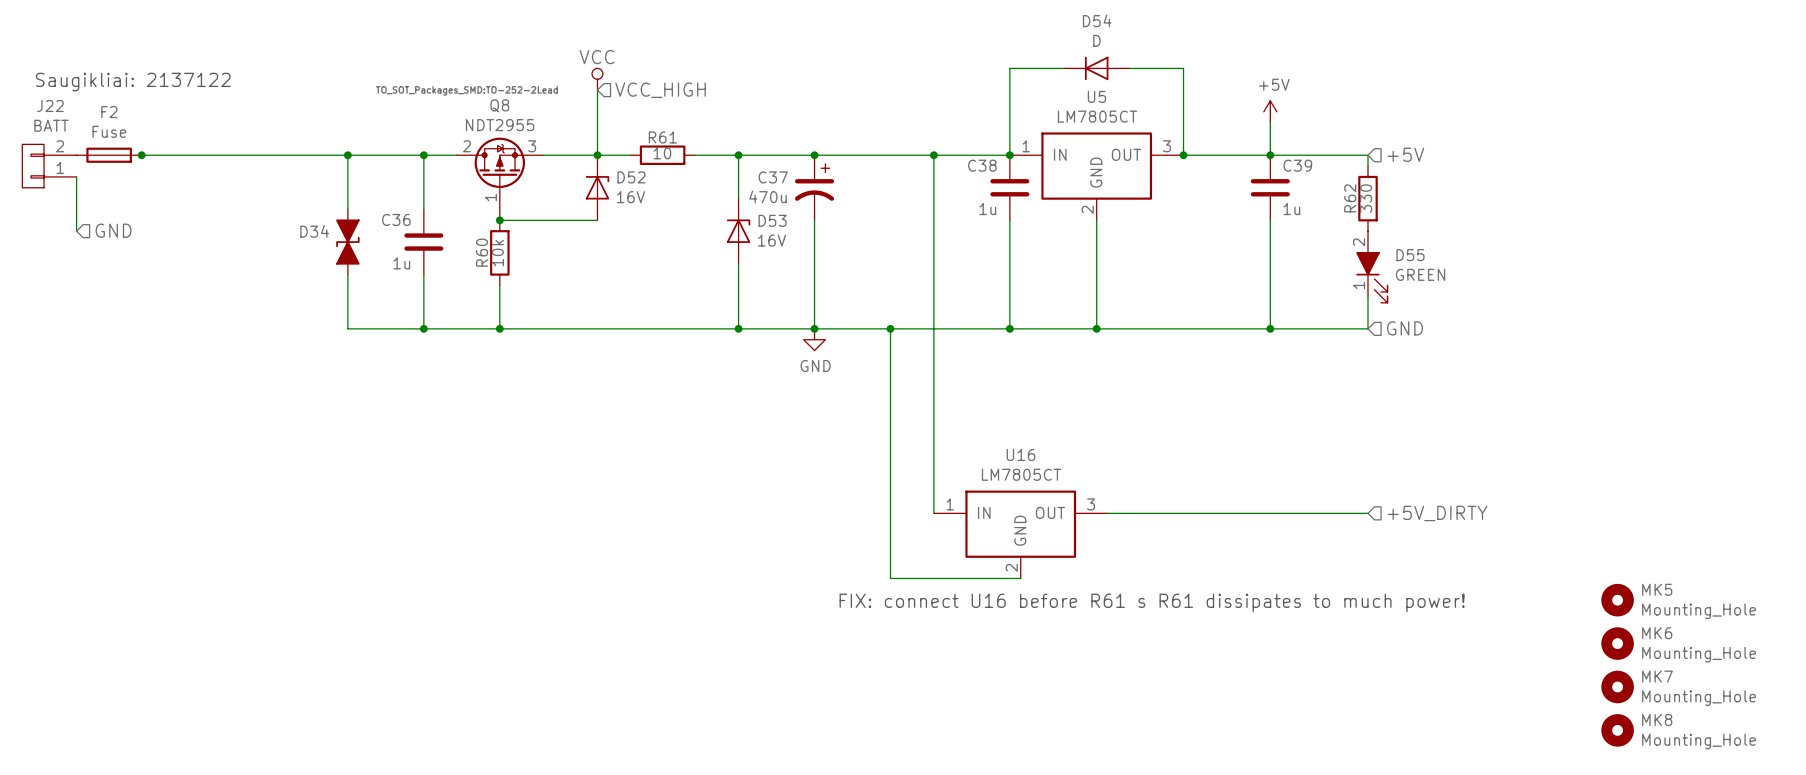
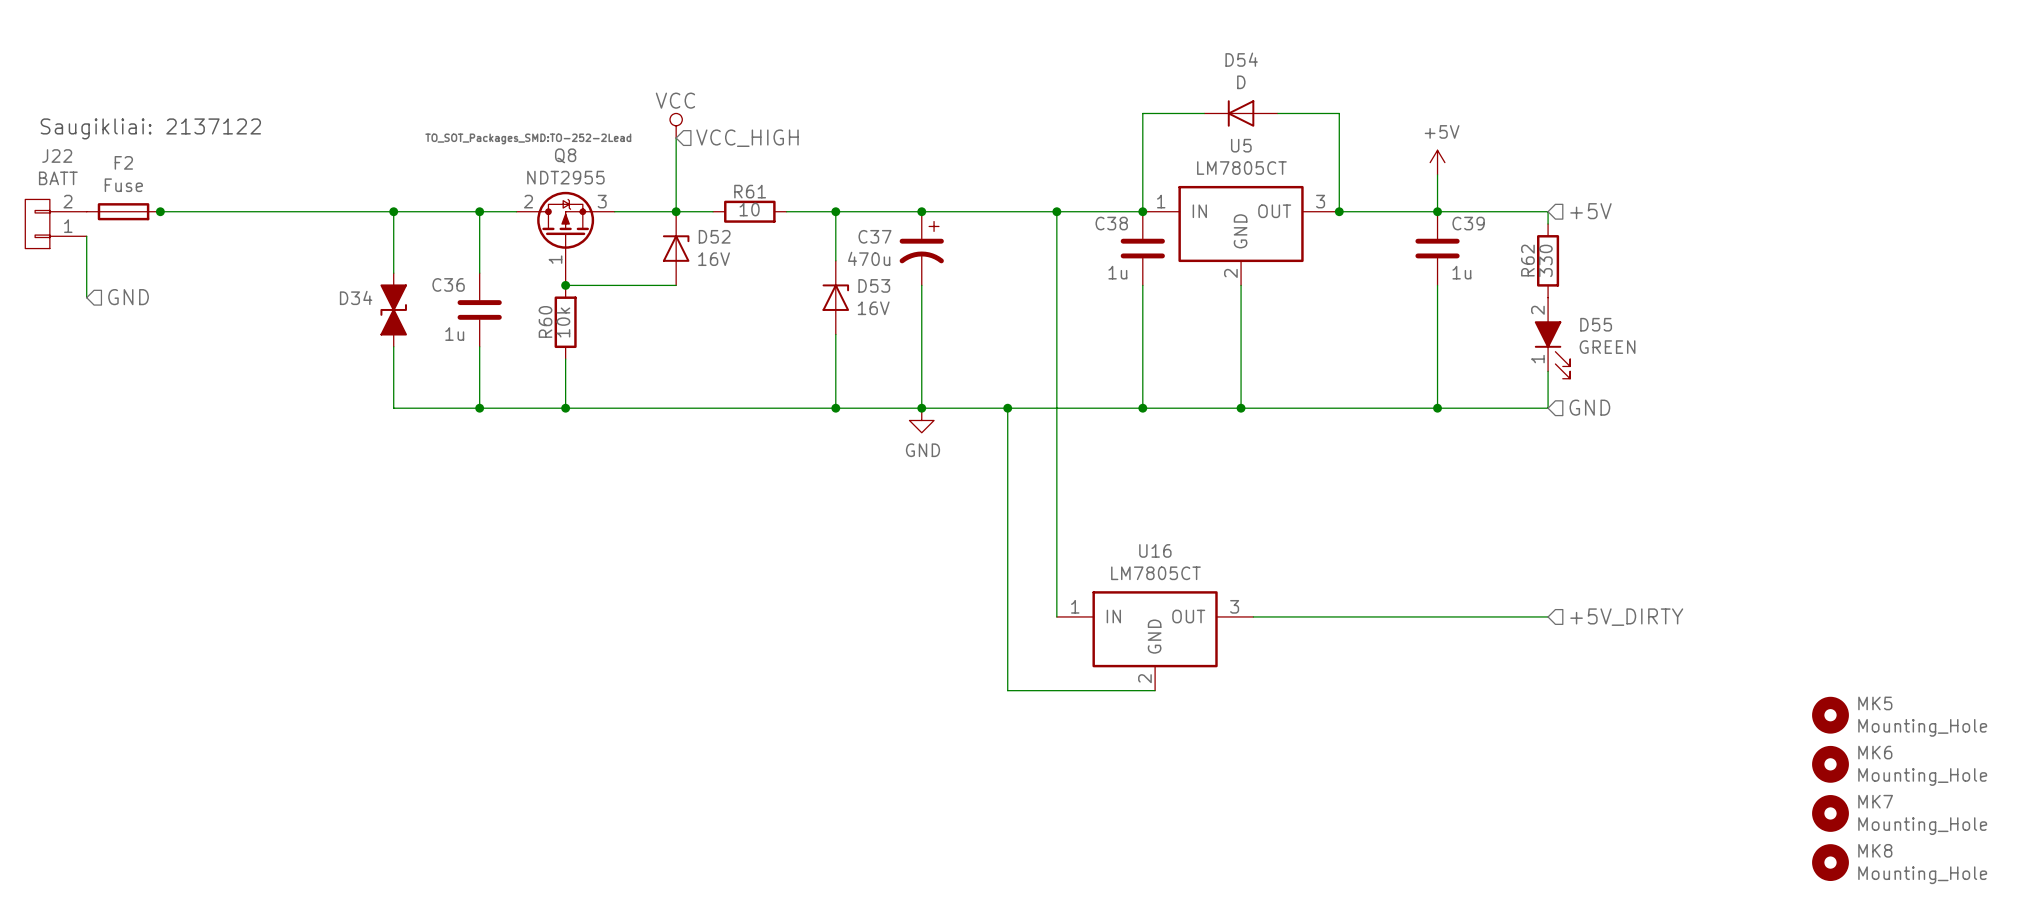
text: FIX: connect U16 before R61 s R61 dissipates to much power! (1152, 602) -> none

